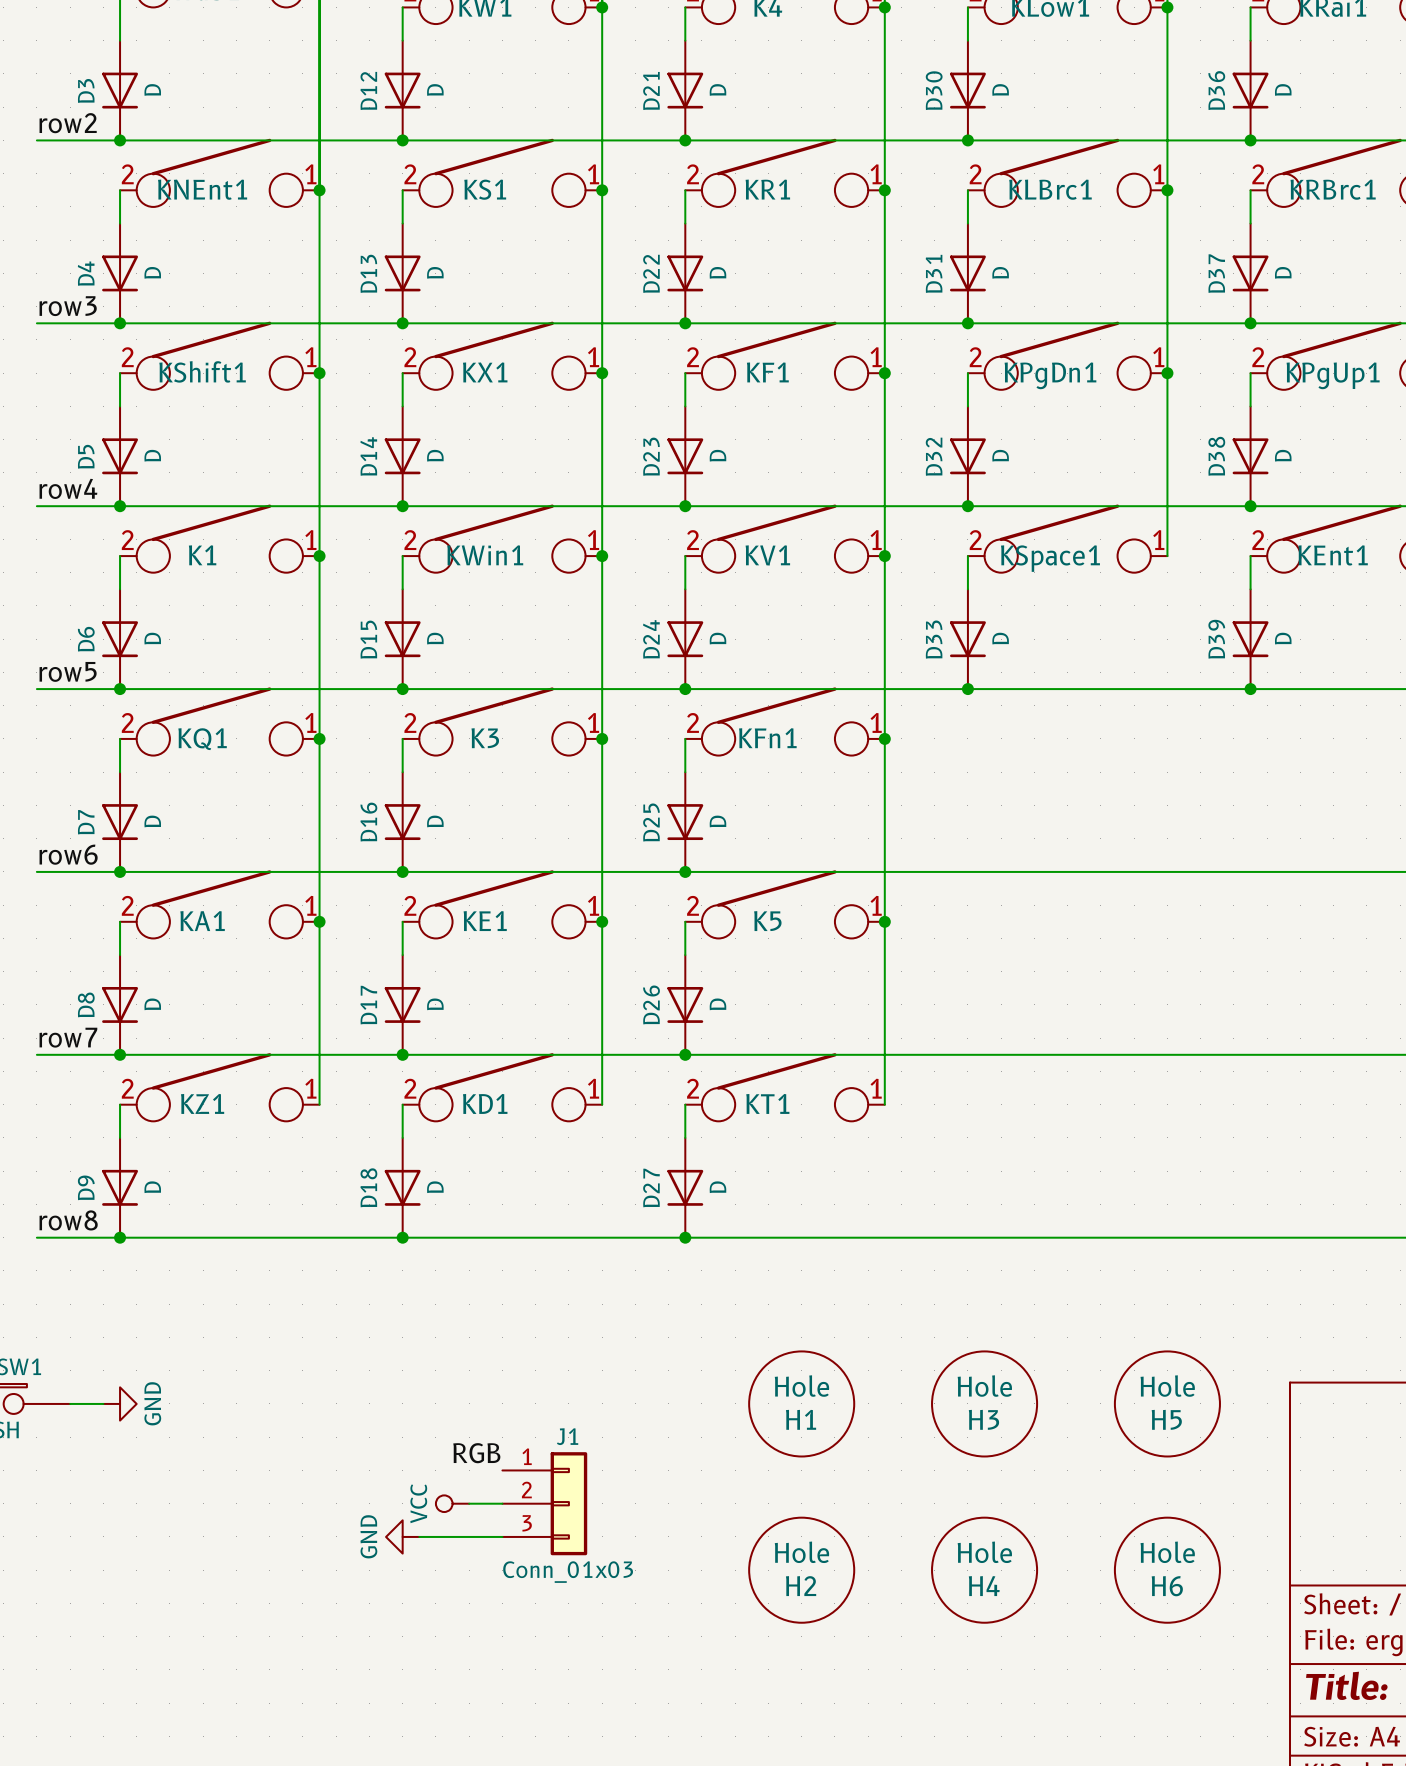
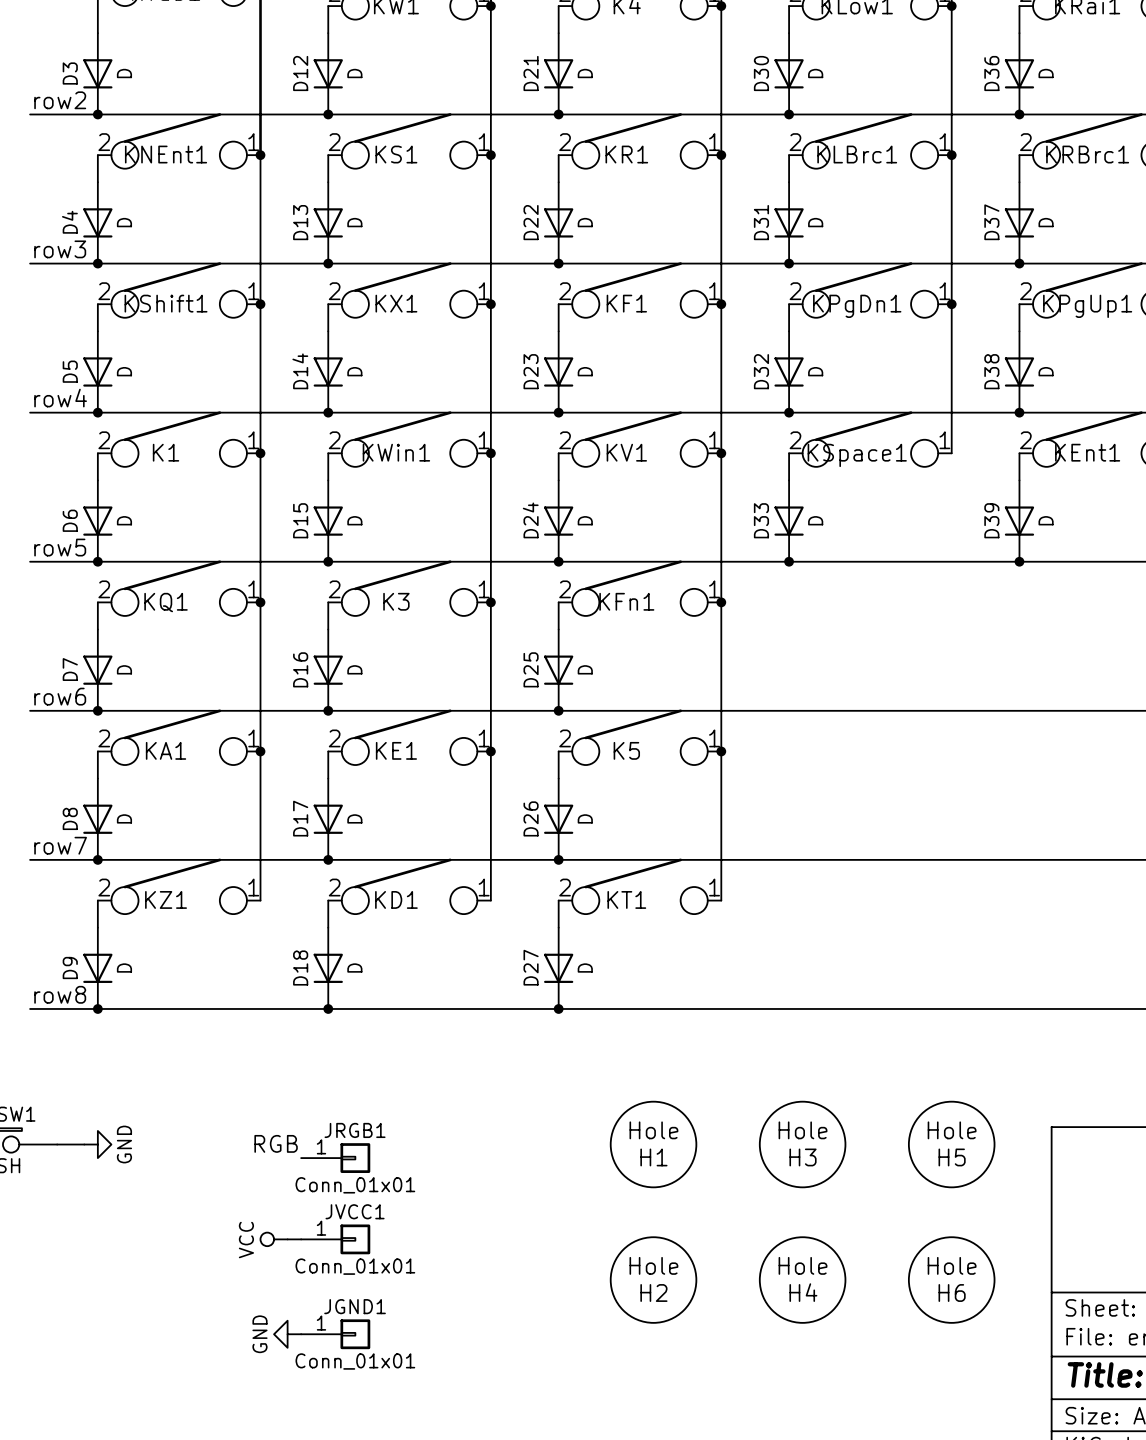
JRGB1: none -> Conn_01x01 (335, 1158)
label position: RGB (476, 1453) -> RGB (276, 1143)
power symbol position: VCC (452, 1503) -> VCC (274, 1239)
wire: (469, 1503) (502, 1503) -> none
J1: Conn_01x03 (544, 1503) -> none
wire: none -> (287, 1239) (301, 1239)
JVCC1: none -> Conn_01x01 (335, 1239)
power symbol position: GND (402, 1536) -> GND (287, 1334)
wire: (419, 1536) (502, 1536) -> none
JGND1: none -> Conn_01x01 (335, 1334)

